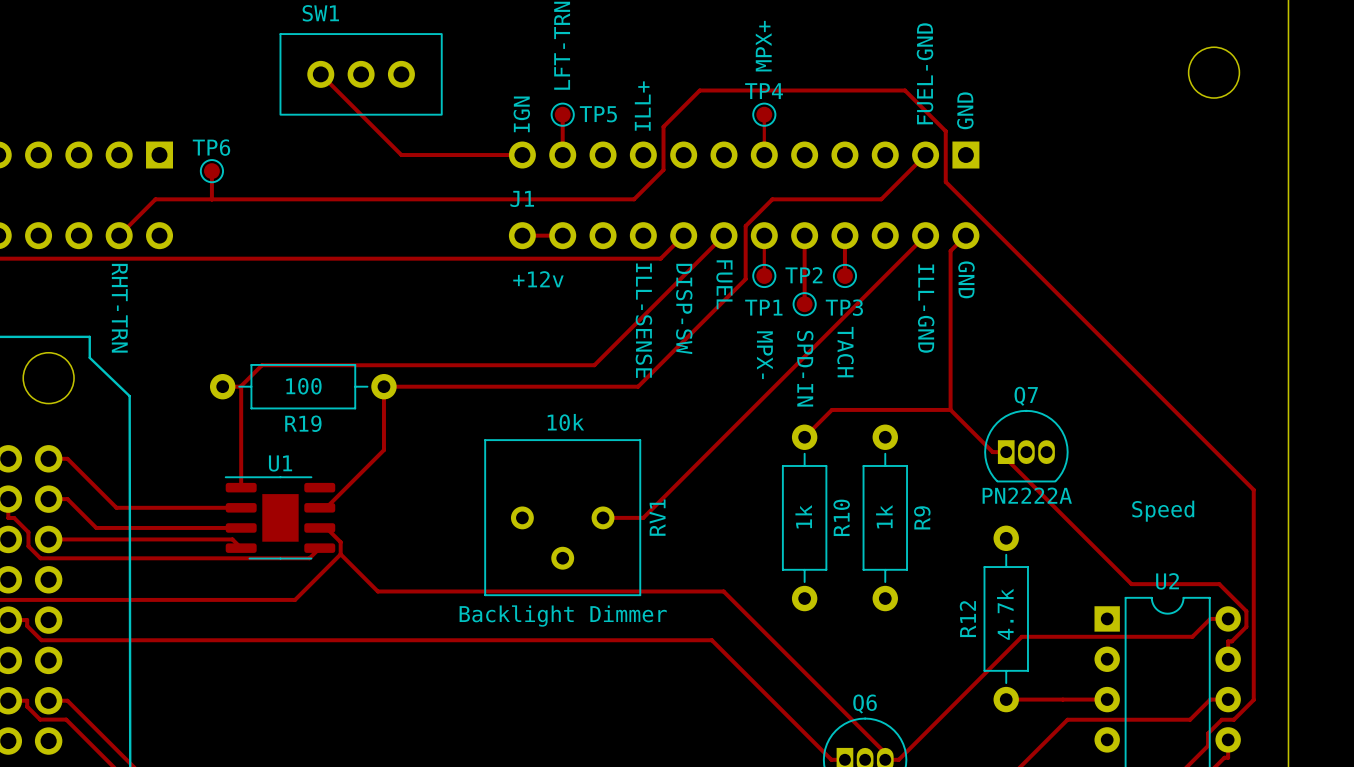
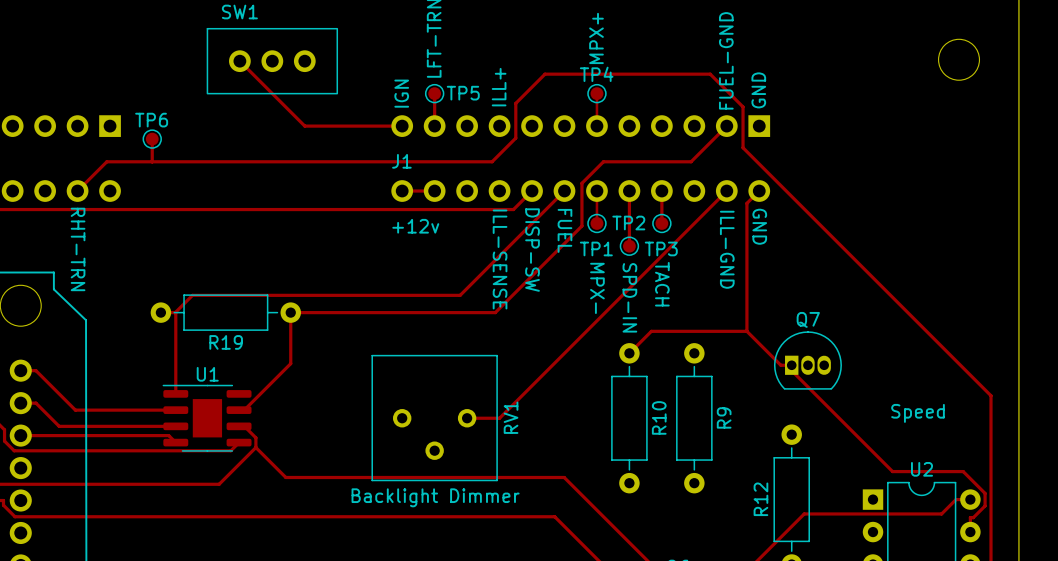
R19 value: 100 (303, 386) -> none
text: 10k (565, 422) -> none
Q7 value: PN2222A (1027, 495) -> none
R10 value: 1k (803, 516) -> none
R9 value: 1k (884, 516) -> none
R12 value: 4.7k (1005, 614) -> none

